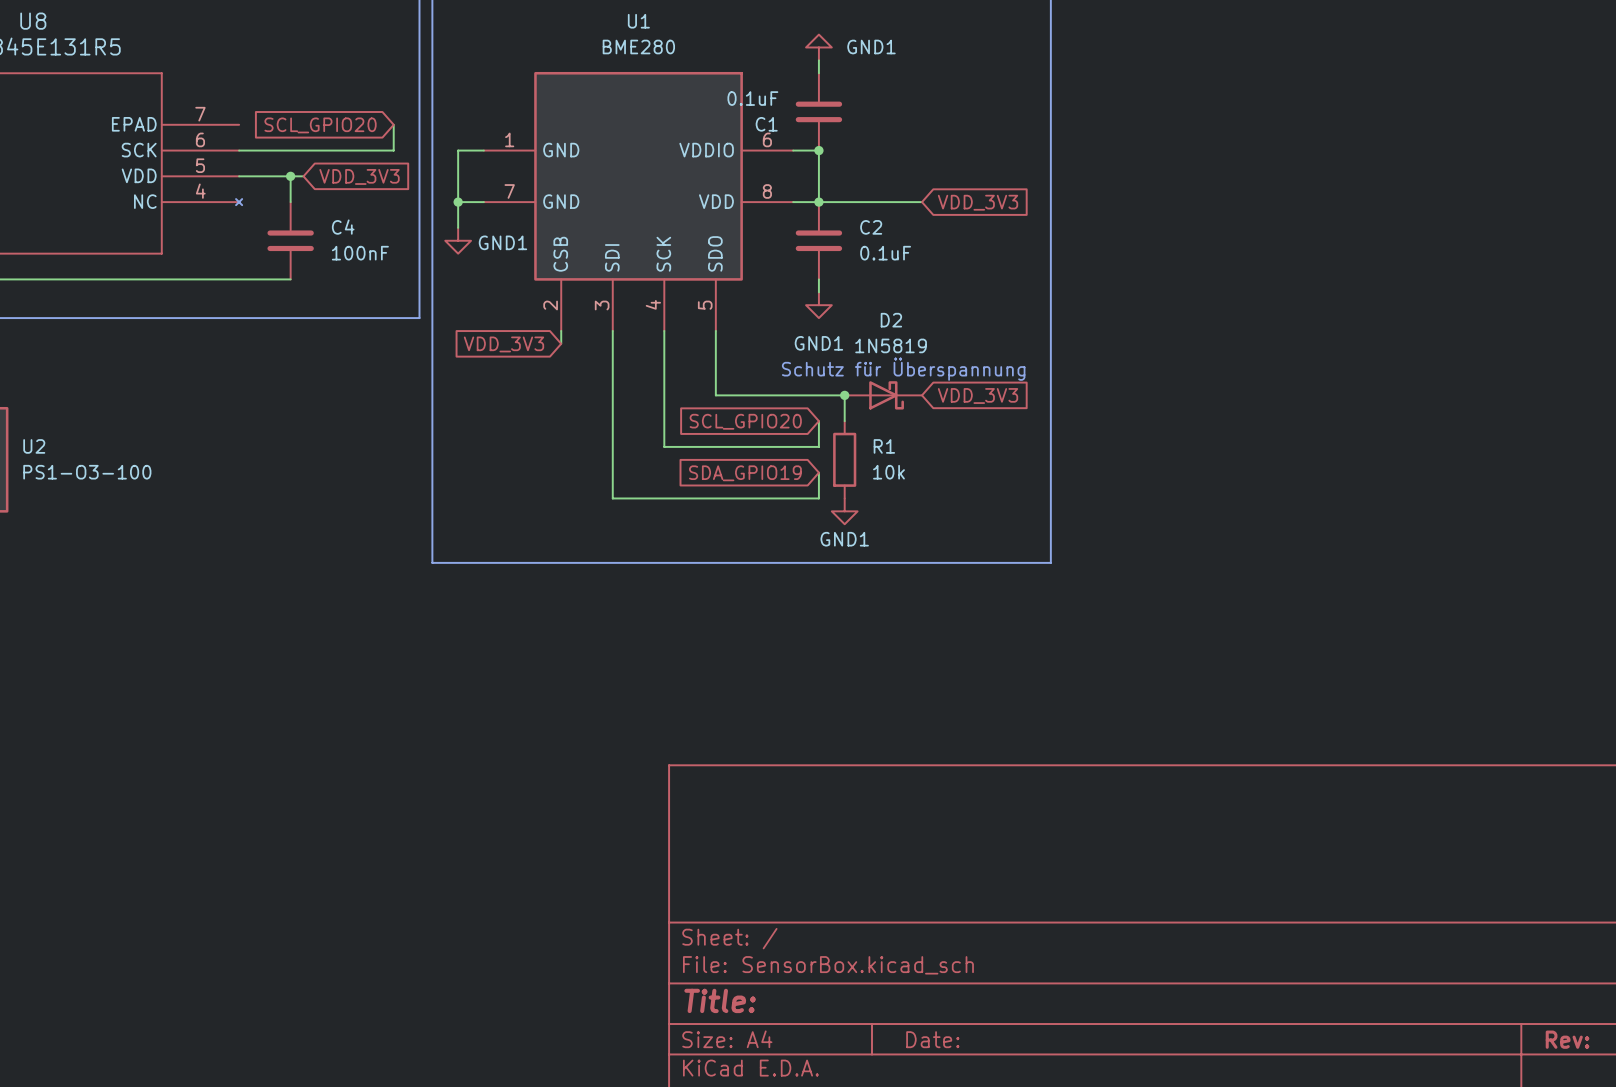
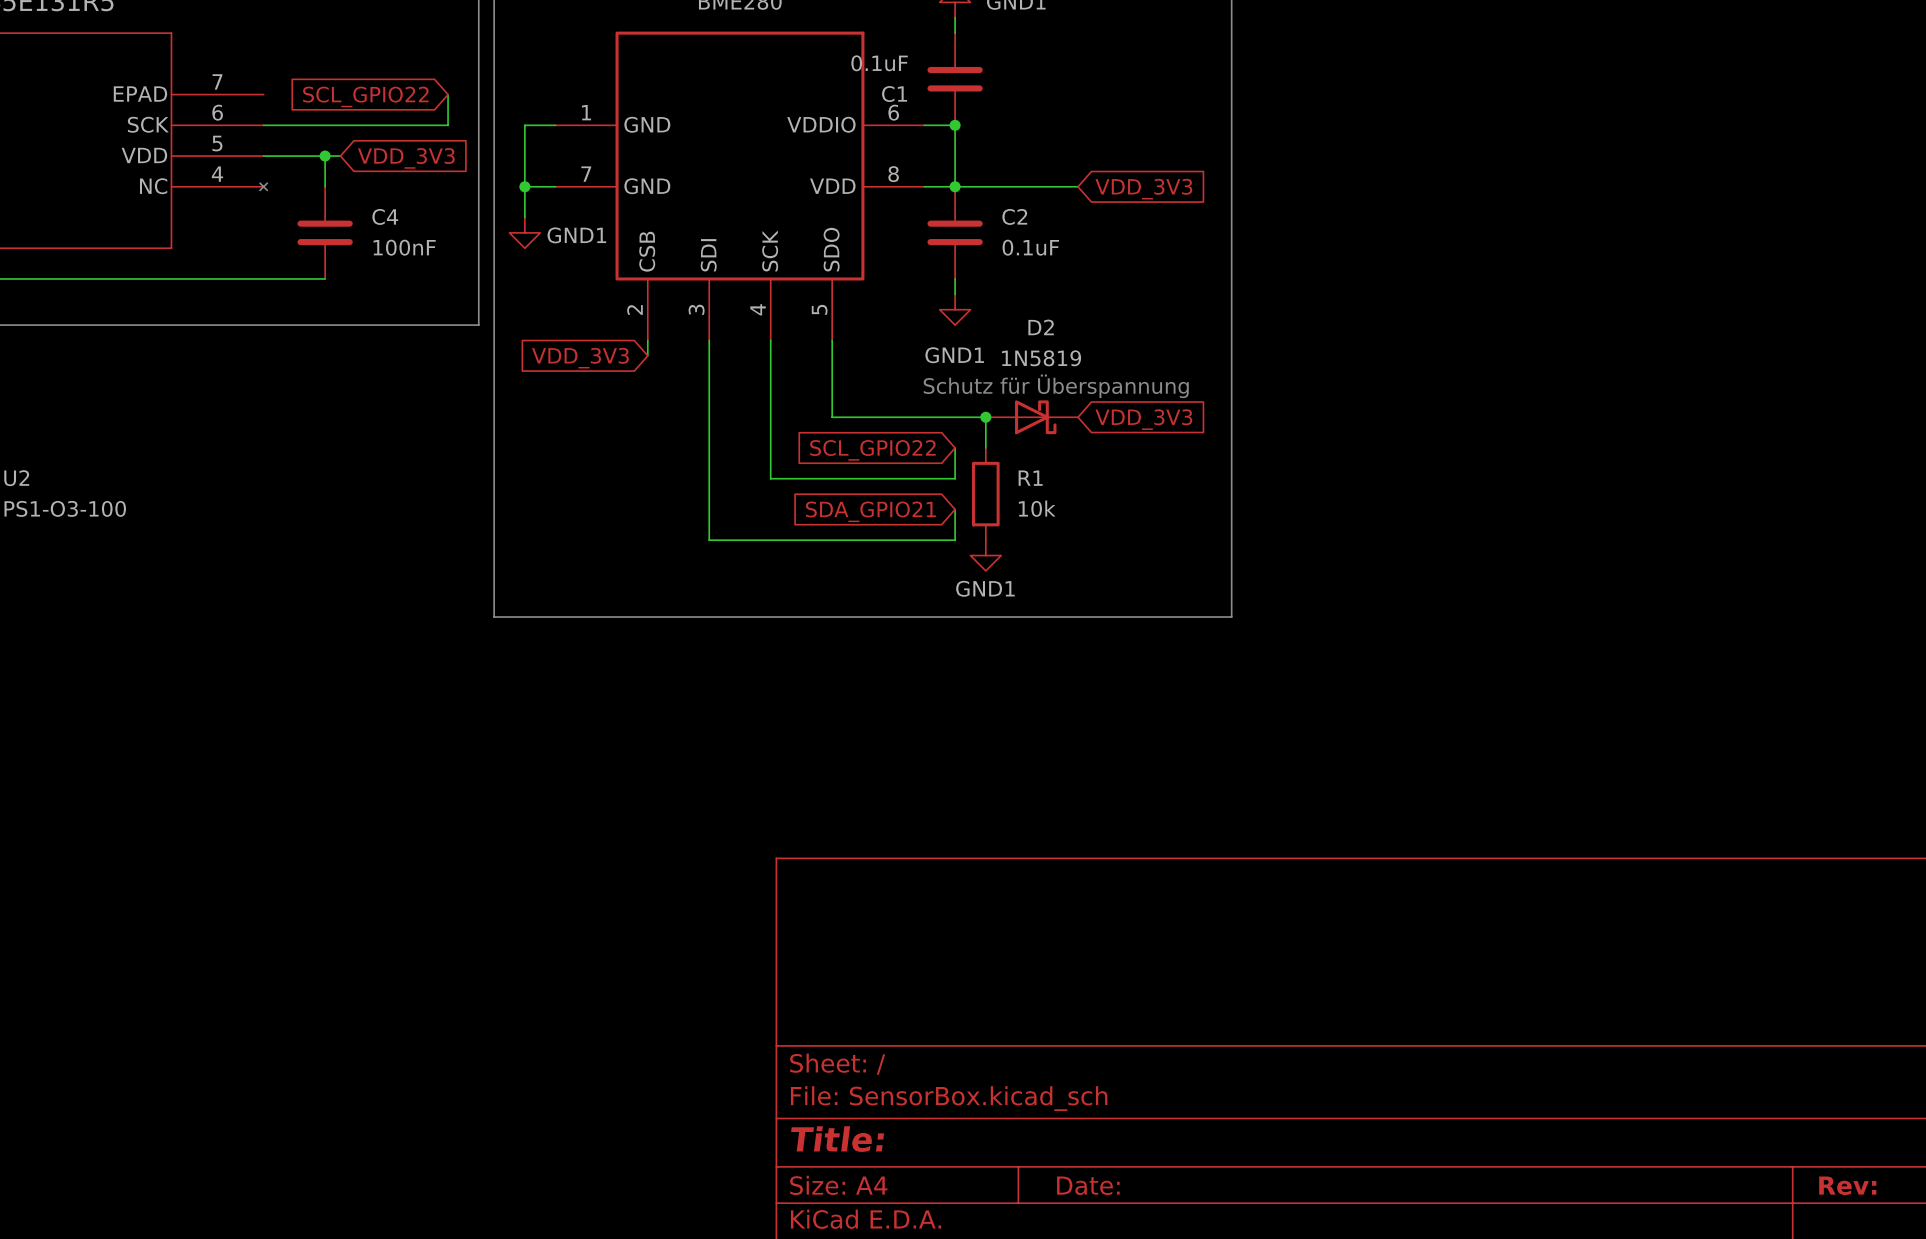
global label: SCL_GPIO20 (320, 125) -> SCL_GPIO22 (365, 96)
global label: SCL_GPIO20 (745, 421) -> SCL_GPIO22 (872, 450)
global label: SDA_GPIO19 (745, 473) -> SDA_GPIO21 (870, 511)

